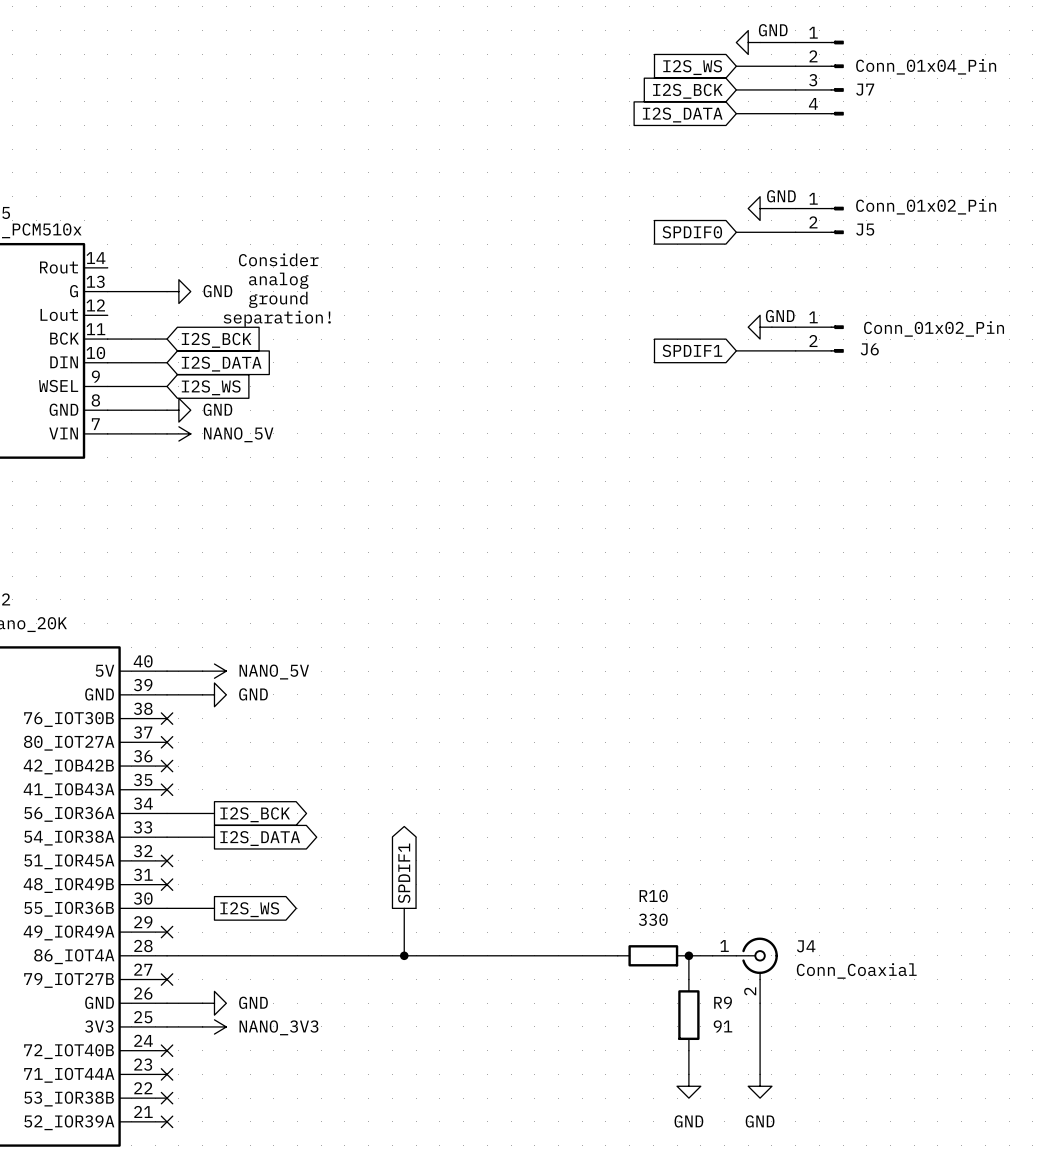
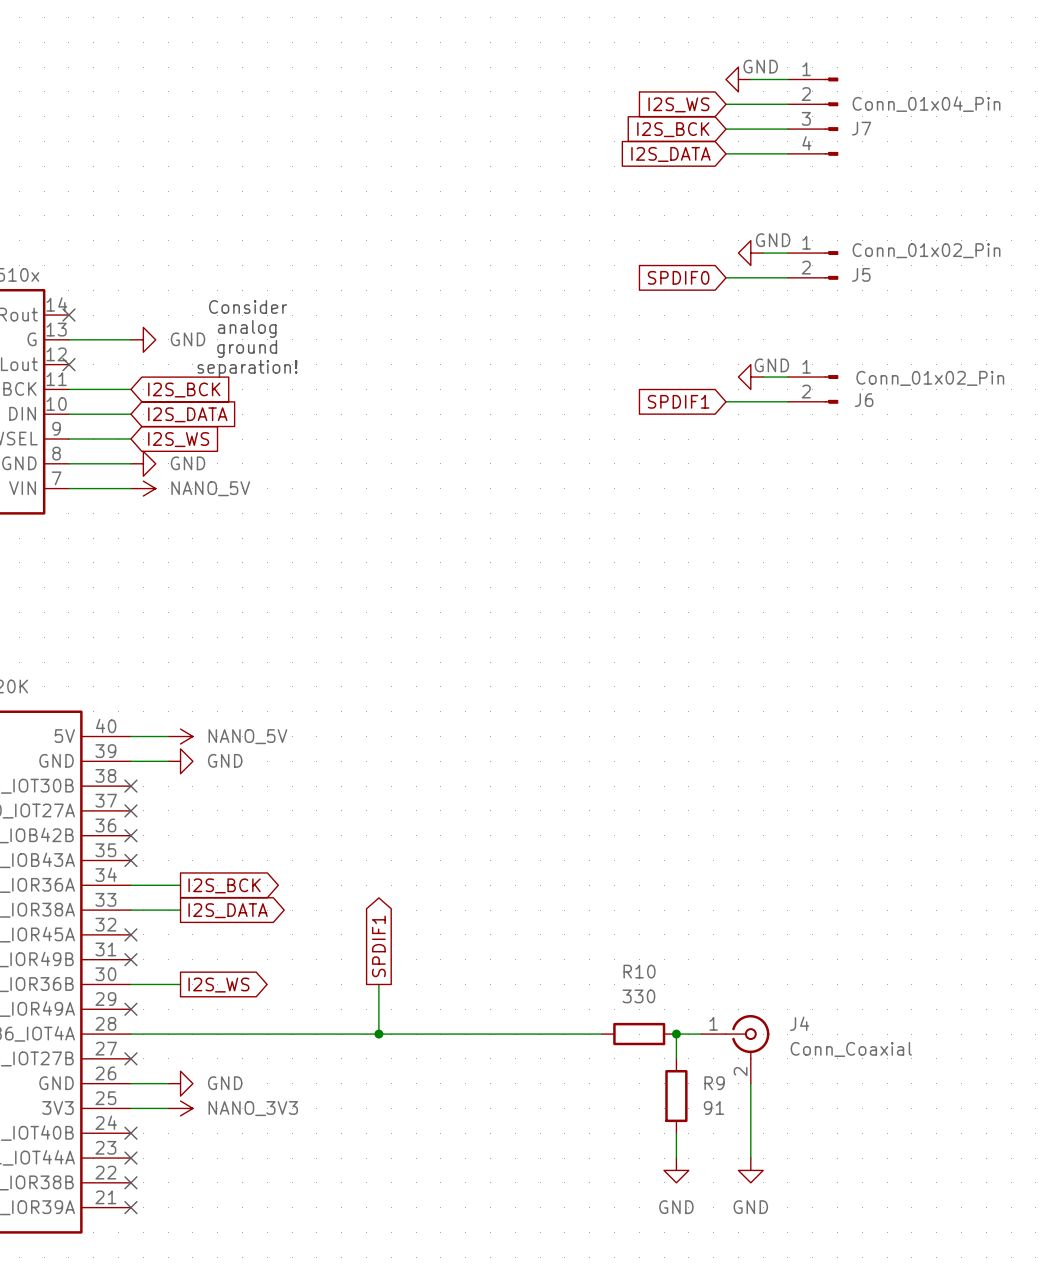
no-connect mark: none -> (68, 315)
no-connect mark: none -> (68, 364)

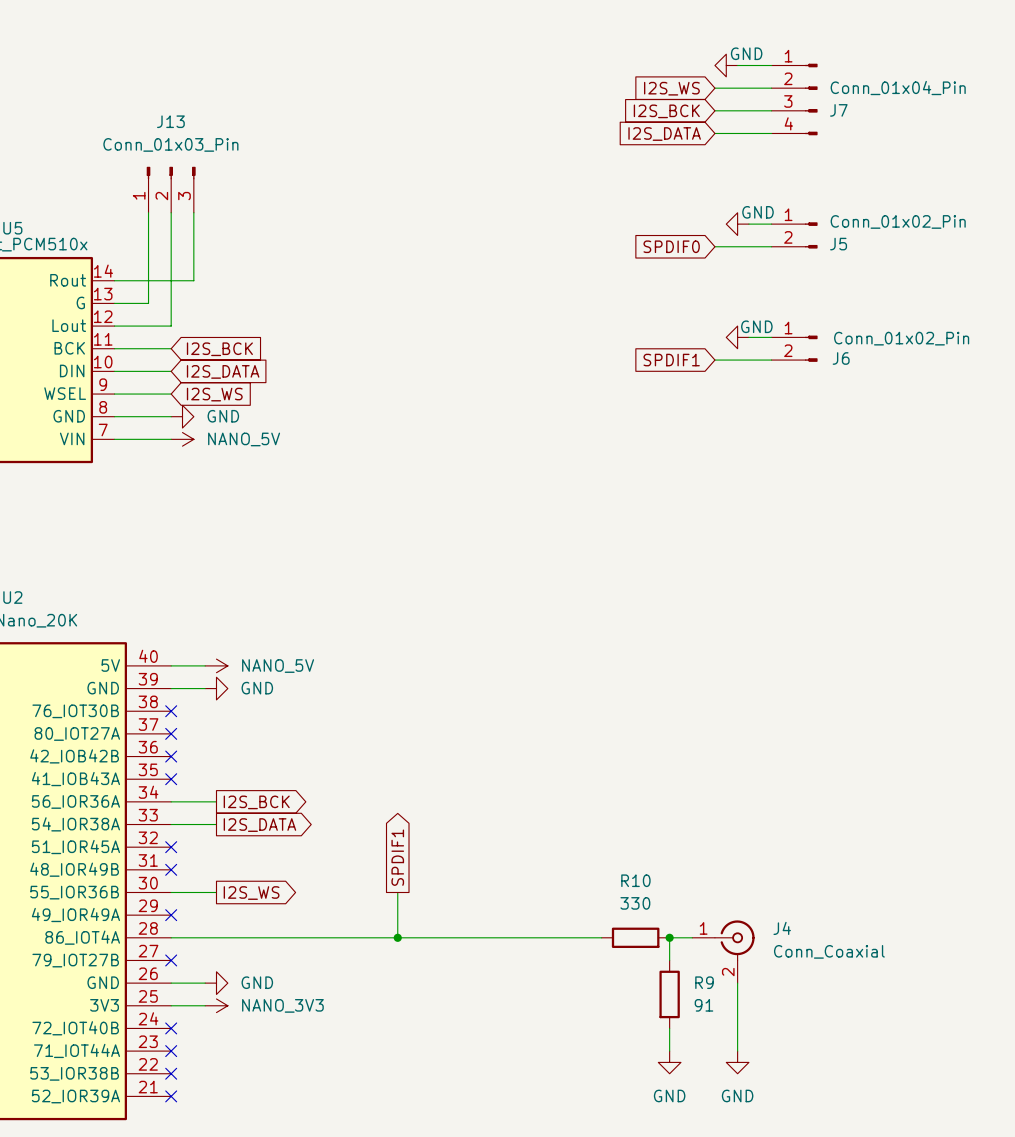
J13: none -> Conn_01x03_Pin (171, 189)
wire: none -> (171, 212) (171, 326) (114, 326)
wire: none -> (193, 212) (193, 280) (114, 280)
text: Consider (248, 306) -> none
no-connect mark: (68, 315) -> none
text: analog (247, 329) -> none
wire: (106, 339) (130, 339) -> (148, 303) (148, 212)
power symbol: GND (143, 339) -> none
text: ground (247, 348) -> none
no-connect mark: (68, 364) -> none
text: separation! (247, 368) -> none

